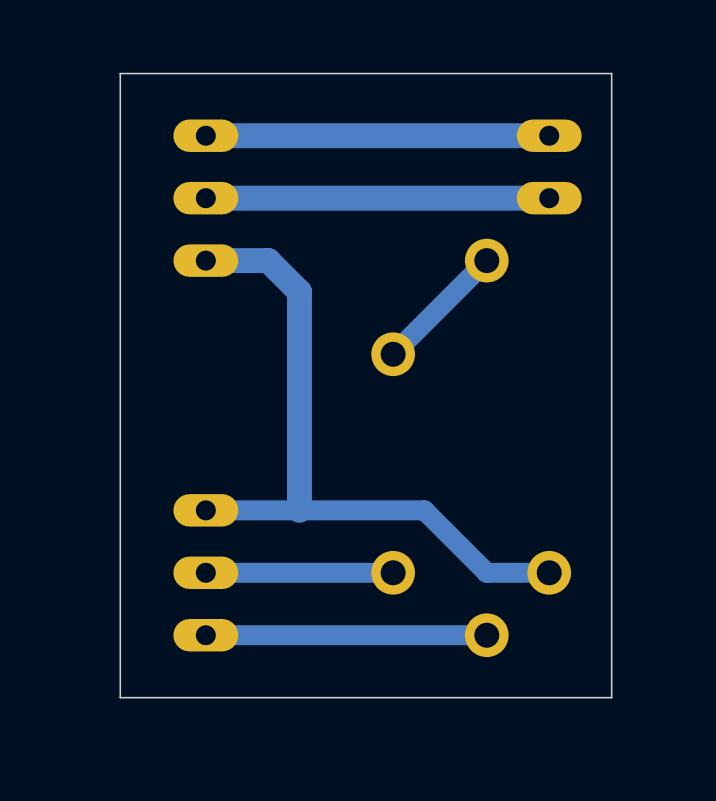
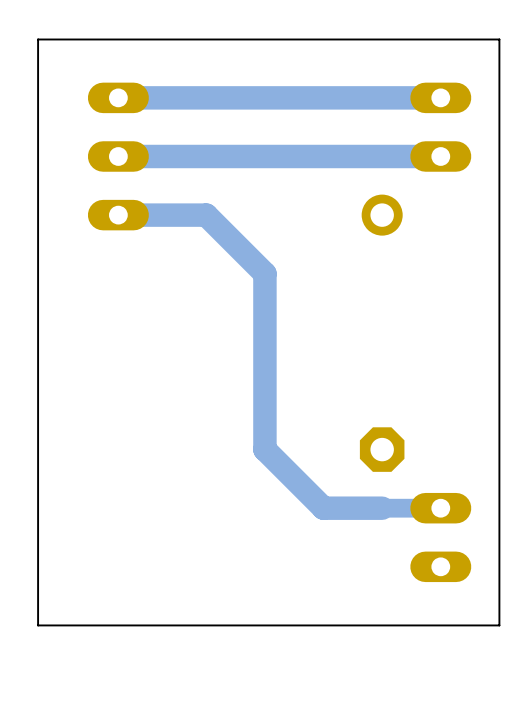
bottom track: (268, 260) (299, 291) (299, 510) -> (177, 215) (206, 215) (264, 273) (264, 449) (323, 508) (382, 508)
bottom track: (486, 260) (393, 354) -> none
part: (393, 354) -> none
bottom track: (205, 510) (424, 510) (486, 572) -> none
part: none -> (382, 449)
part: (205, 572) -> none
bottom track: (393, 572) (205, 572) -> none
part: (393, 572) -> none
part: (549, 572) -> none
part: none -> (440, 537)
bottom track: (486, 635) (205, 635) -> none
part: (486, 635) -> none

